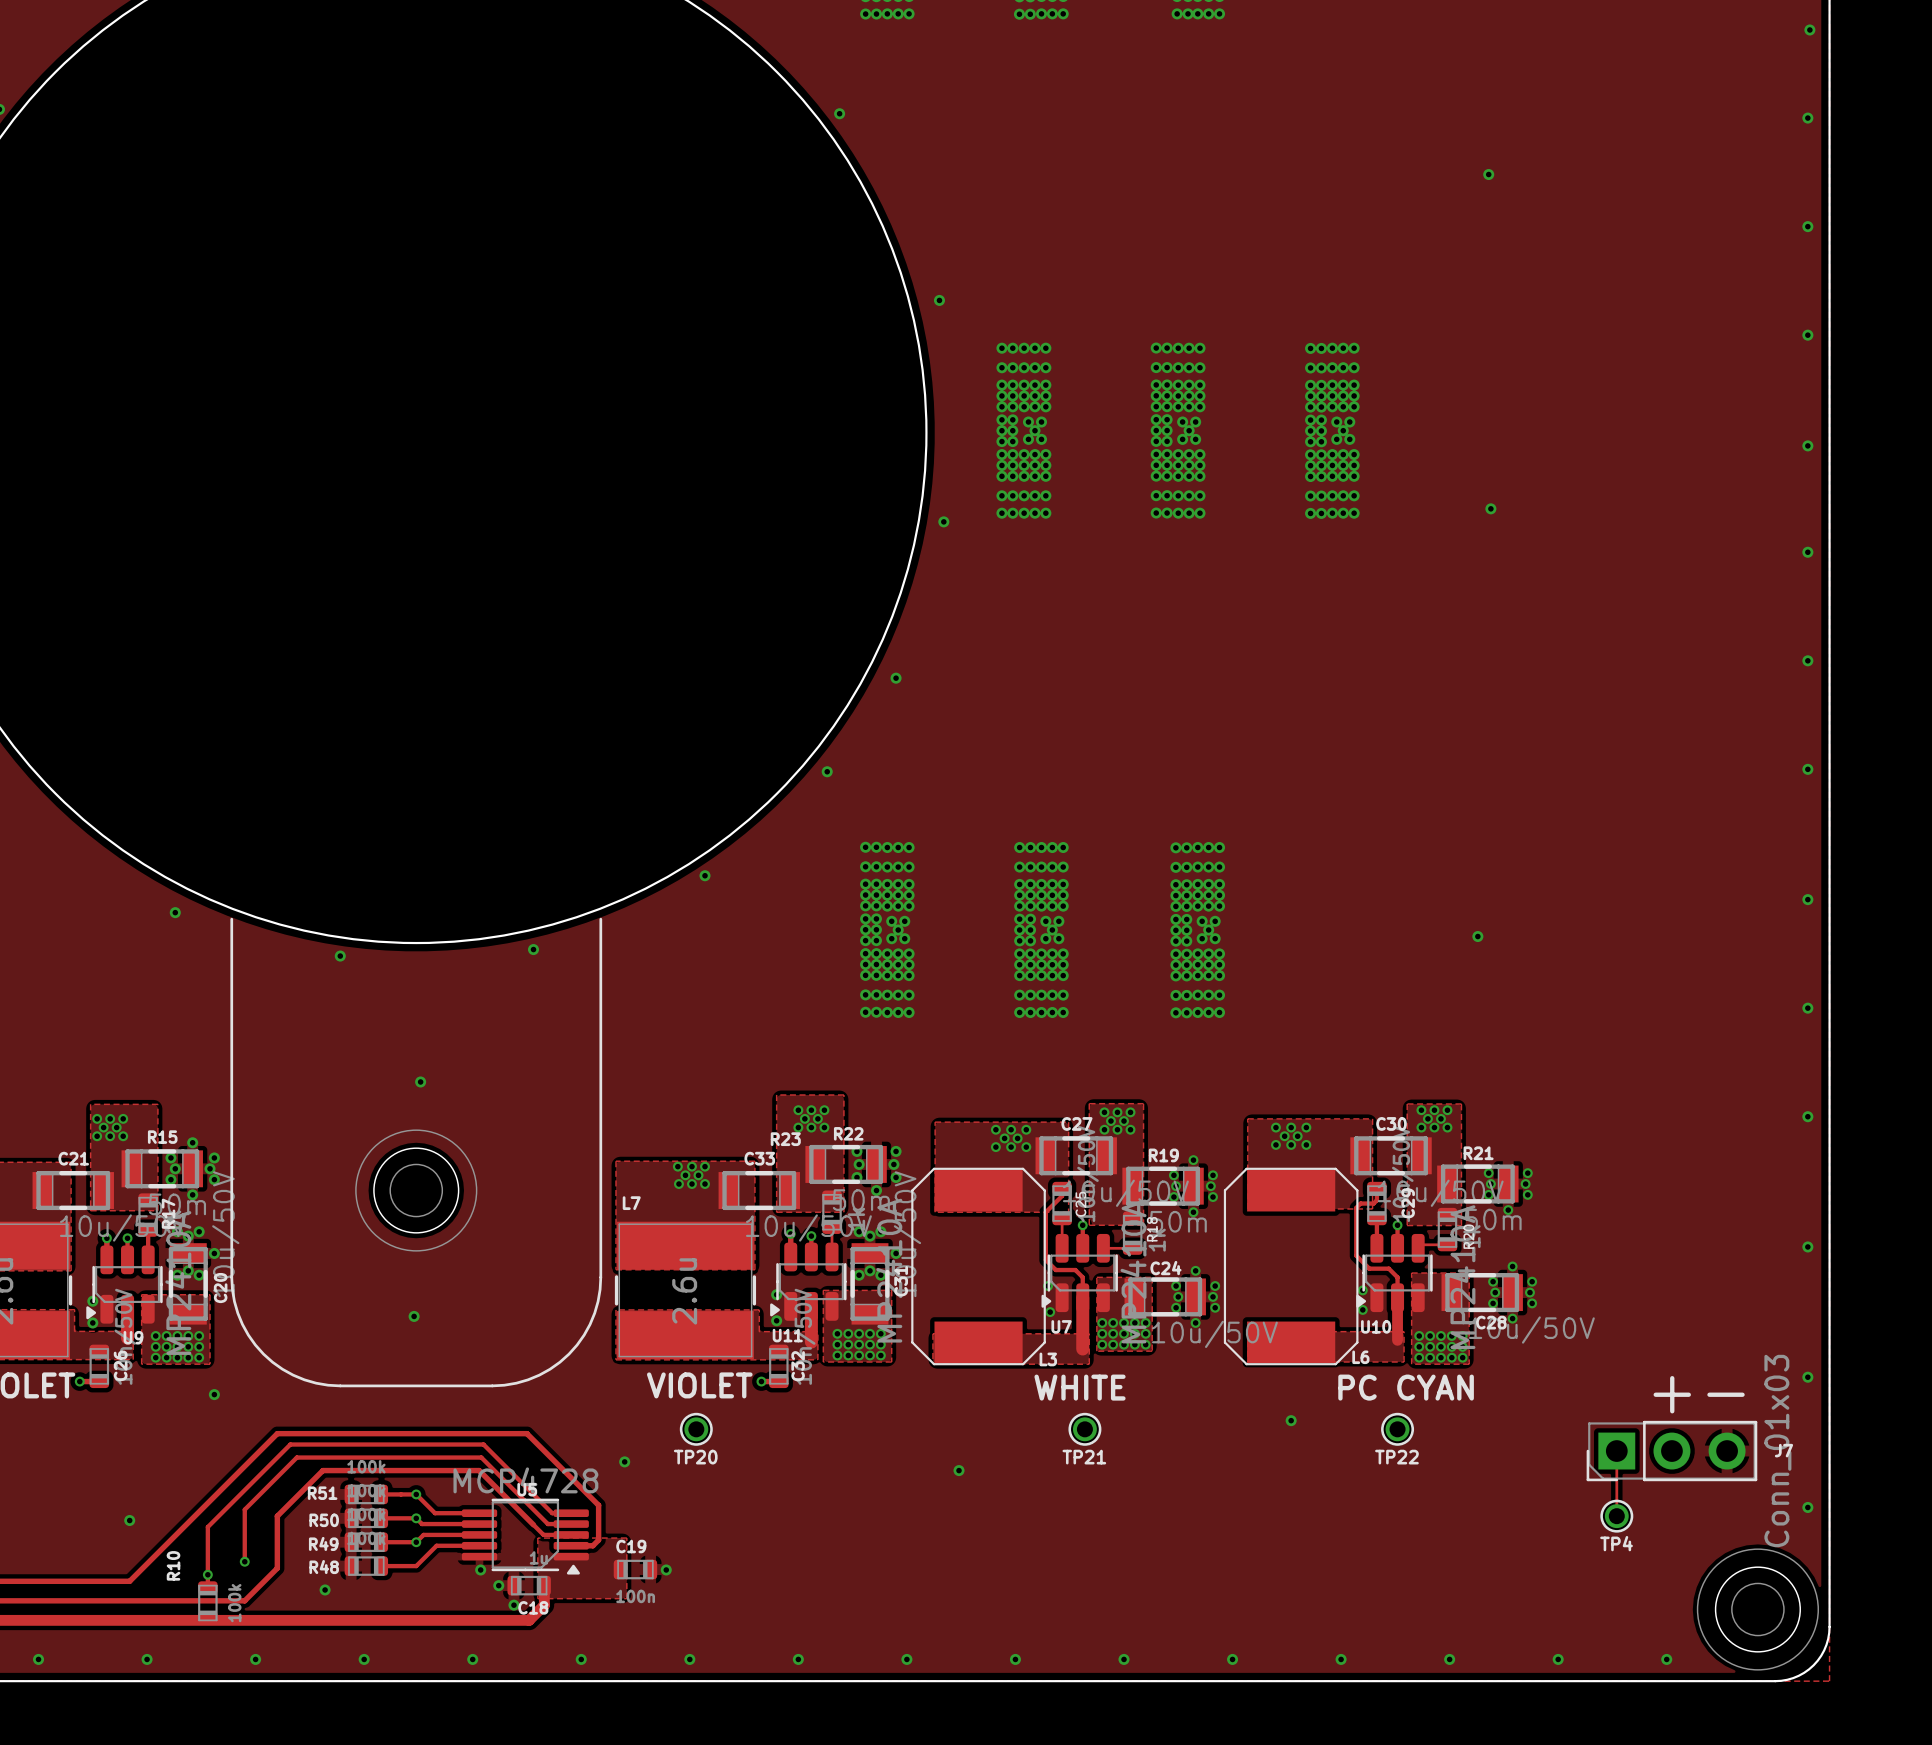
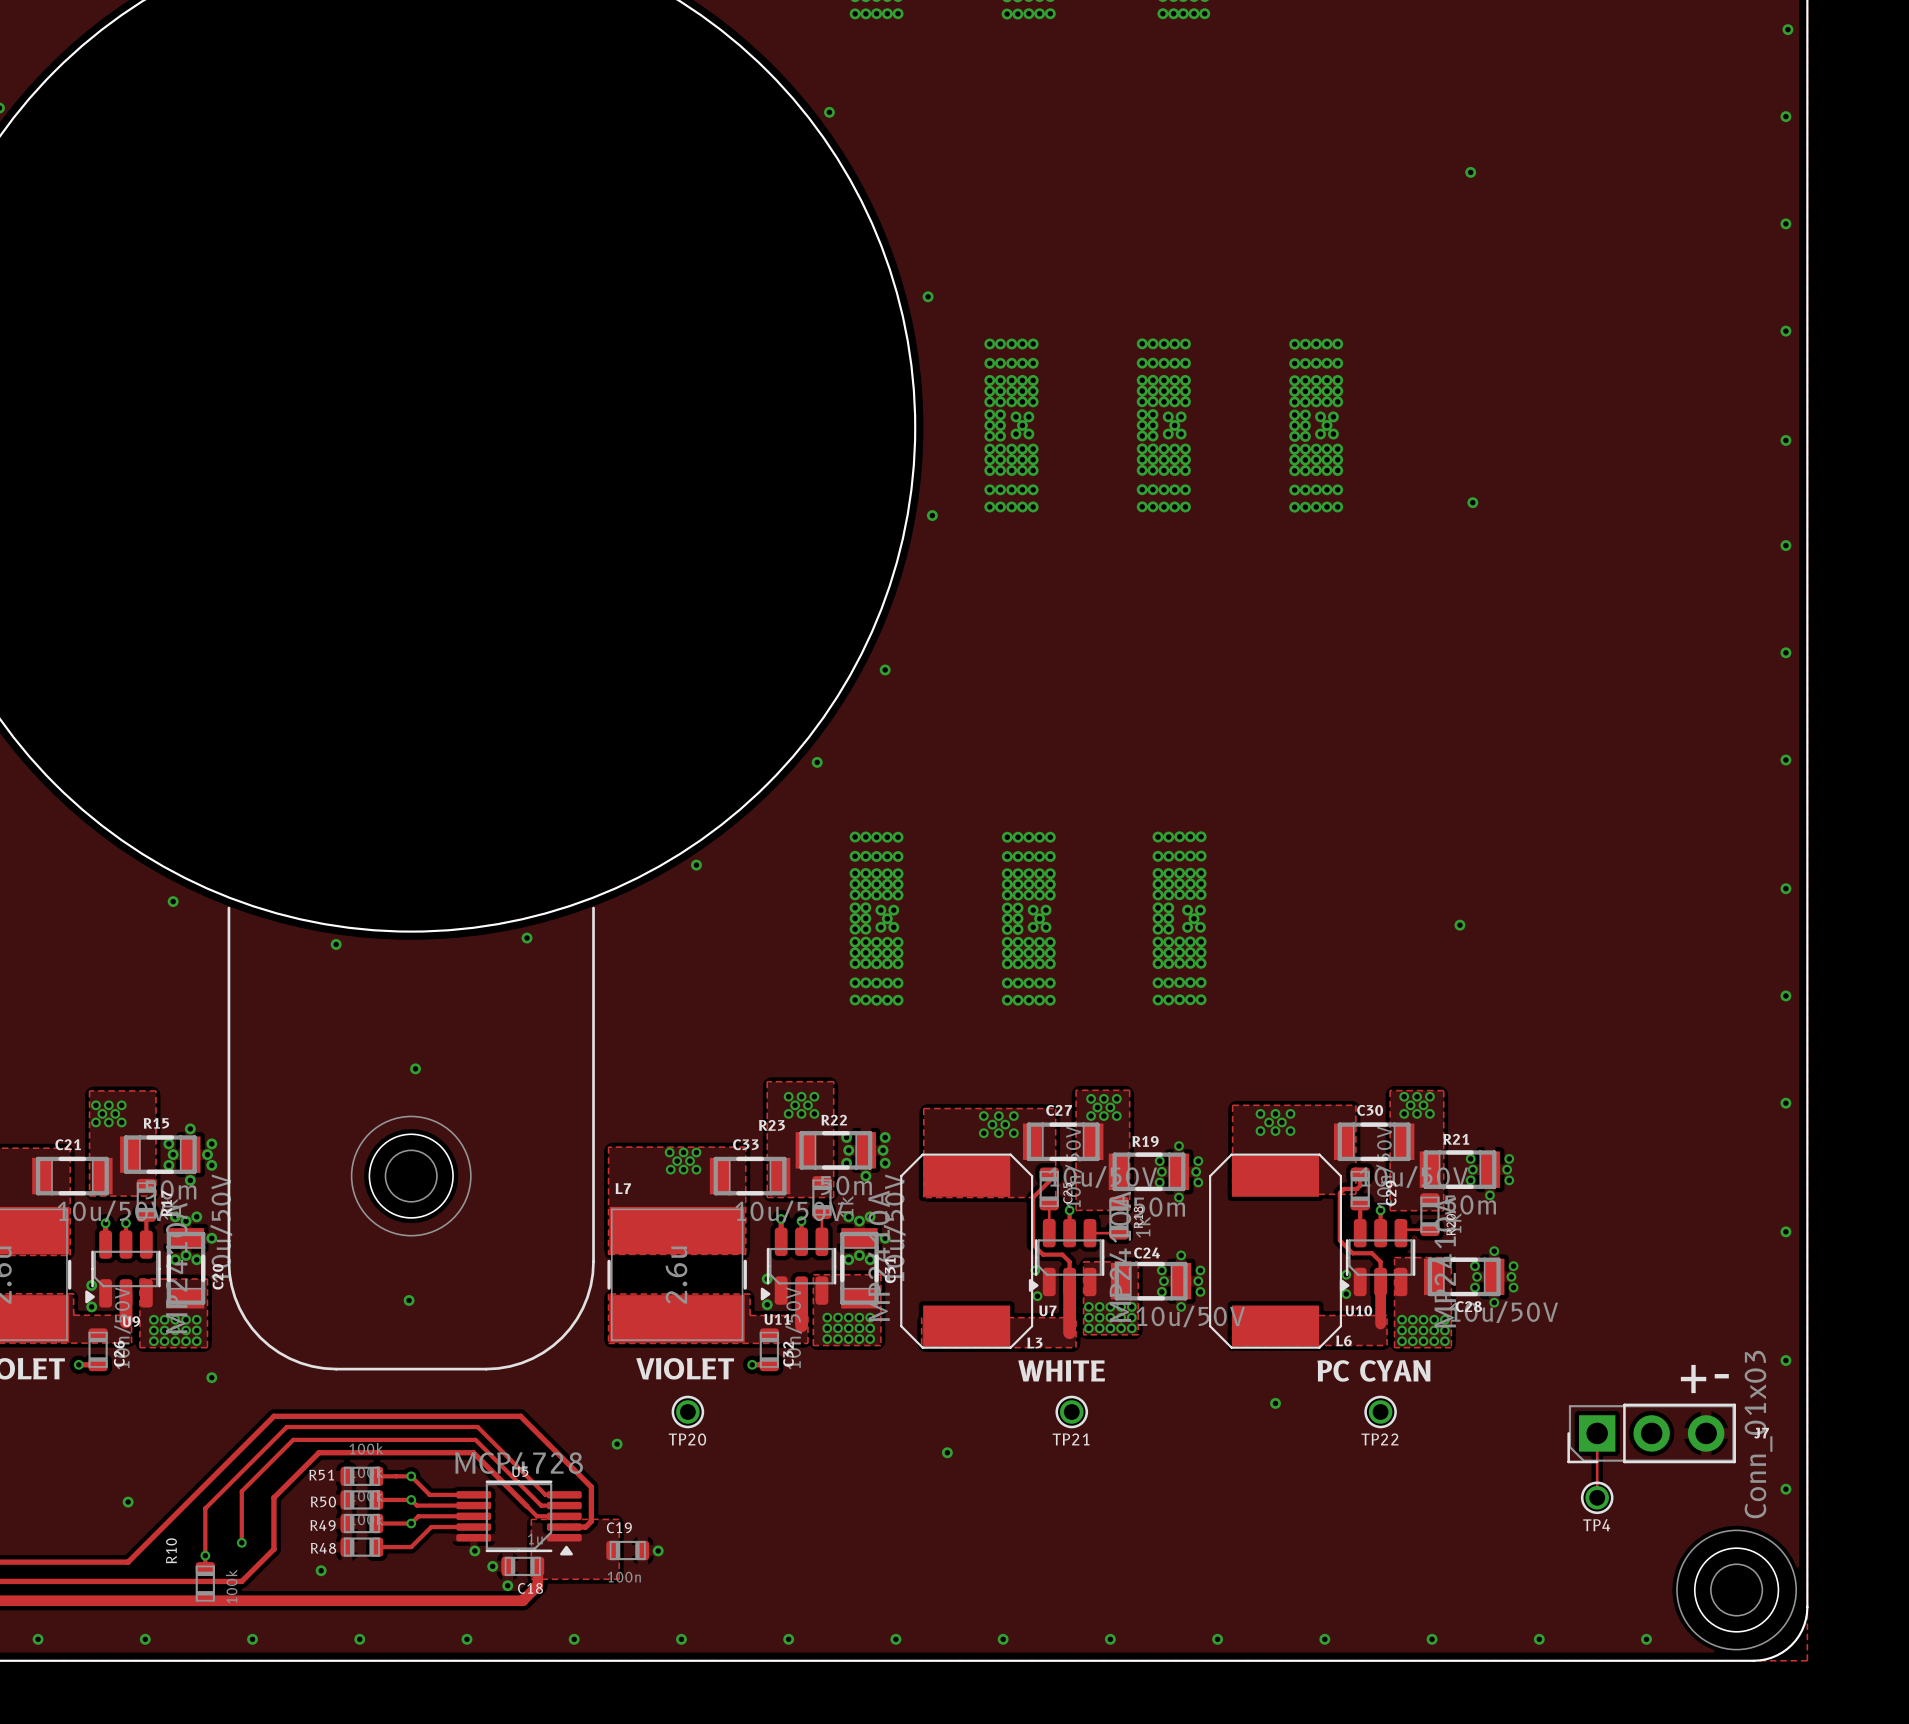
via: none -> (1158, 837)
via: (1175, 847) -> none
via: none -> (1168, 837)
via: (1186, 847) -> none
via: none -> (1179, 836)
via: (1197, 847) -> none
via: none -> (1190, 836)
via: (1208, 847) -> none
via: none -> (1201, 836)
via: (1219, 847) -> none
via: none -> (1158, 856)
via: none -> (1168, 856)
via: none -> (1179, 856)
via: none -> (1190, 856)
via: none -> (1201, 856)
via: (1175, 867) -> none
via: (1186, 867) -> none
via: (1197, 867) -> none
via: (1208, 867) -> none
via: (1219, 867) -> none
via: none -> (1179, 873)
via: none -> (1190, 873)
via: none -> (1201, 873)
via: none -> (1158, 873)
via: (1175, 884) -> none
via: none -> (1168, 873)
via: (1186, 884) -> none
via: (1197, 884) -> none
via: (1208, 884) -> none
via: (1219, 884) -> none
via: none -> (1179, 883)
via: none -> (1190, 883)
via: none -> (1201, 883)
via: none -> (1158, 884)
via: (1175, 895) -> none
via: none -> (1168, 884)
via: (1186, 895) -> none
via: (1197, 895) -> none
via: (1208, 895) -> none
via: (1219, 895) -> none
via: none -> (1158, 894)
via: none -> (1168, 894)
via: none -> (1179, 894)
via: none -> (1190, 894)
via: none -> (1201, 894)
via: (1175, 906) -> none
via: (1186, 906) -> none
via: (1197, 906) -> none
via: (1208, 906) -> none
via: (1219, 906) -> none
via: none -> (1158, 907)
via: none -> (1168, 907)
via: (1175, 919) -> none
via: (1186, 919) -> none
via: none -> (1158, 918)
via: none -> (1168, 918)
via: (1175, 930) -> none
via: (1186, 930) -> none
via: none -> (1158, 929)
via: none -> (1168, 929)
via: (1175, 941) -> none
via: (1186, 941) -> none
via: none -> (1158, 942)
via: none -> (1168, 942)
via: none -> (1179, 941)
via: (1197, 953) -> none
via: none -> (1190, 941)
via: (1208, 953) -> none
via: none -> (1201, 941)
via: (1219, 953) -> none
via: (1175, 954) -> none
via: (1186, 954) -> none
via: none -> (1158, 952)
via: none -> (1168, 952)
via: none -> (1179, 952)
via: (1197, 964) -> none
via: none -> (1190, 952)
via: (1208, 964) -> none
via: none -> (1201, 952)
via: (1219, 964) -> none
via: (1175, 965) -> none
via: (1186, 965) -> none
via: none -> (1158, 963)
via: (1175, 975) -> none
via: none -> (1168, 963)
via: (1186, 975) -> none
via: none -> (1179, 963)
via: (1197, 975) -> none
via: none -> (1190, 963)
via: (1208, 975) -> none
via: none -> (1201, 963)
via: (1219, 975) -> none
via: none -> (1158, 982)
via: none -> (1168, 982)
via: none -> (1179, 982)
via: none -> (1190, 982)
via: none -> (1201, 982)
via: (1175, 995) -> none
via: (1186, 995) -> none
via: (1197, 995) -> none
via: (1208, 995) -> none
via: (1219, 995) -> none
via: none -> (1158, 1000)
via: (1175, 1012) -> none
via: none -> (1168, 1000)
via: (1186, 1012) -> none
via: none -> (1179, 999)
via: (1197, 1012) -> none
via: none -> (1190, 999)
via: (1208, 1012) -> none
via: none -> (1201, 999)
via: (1219, 1012) -> none

